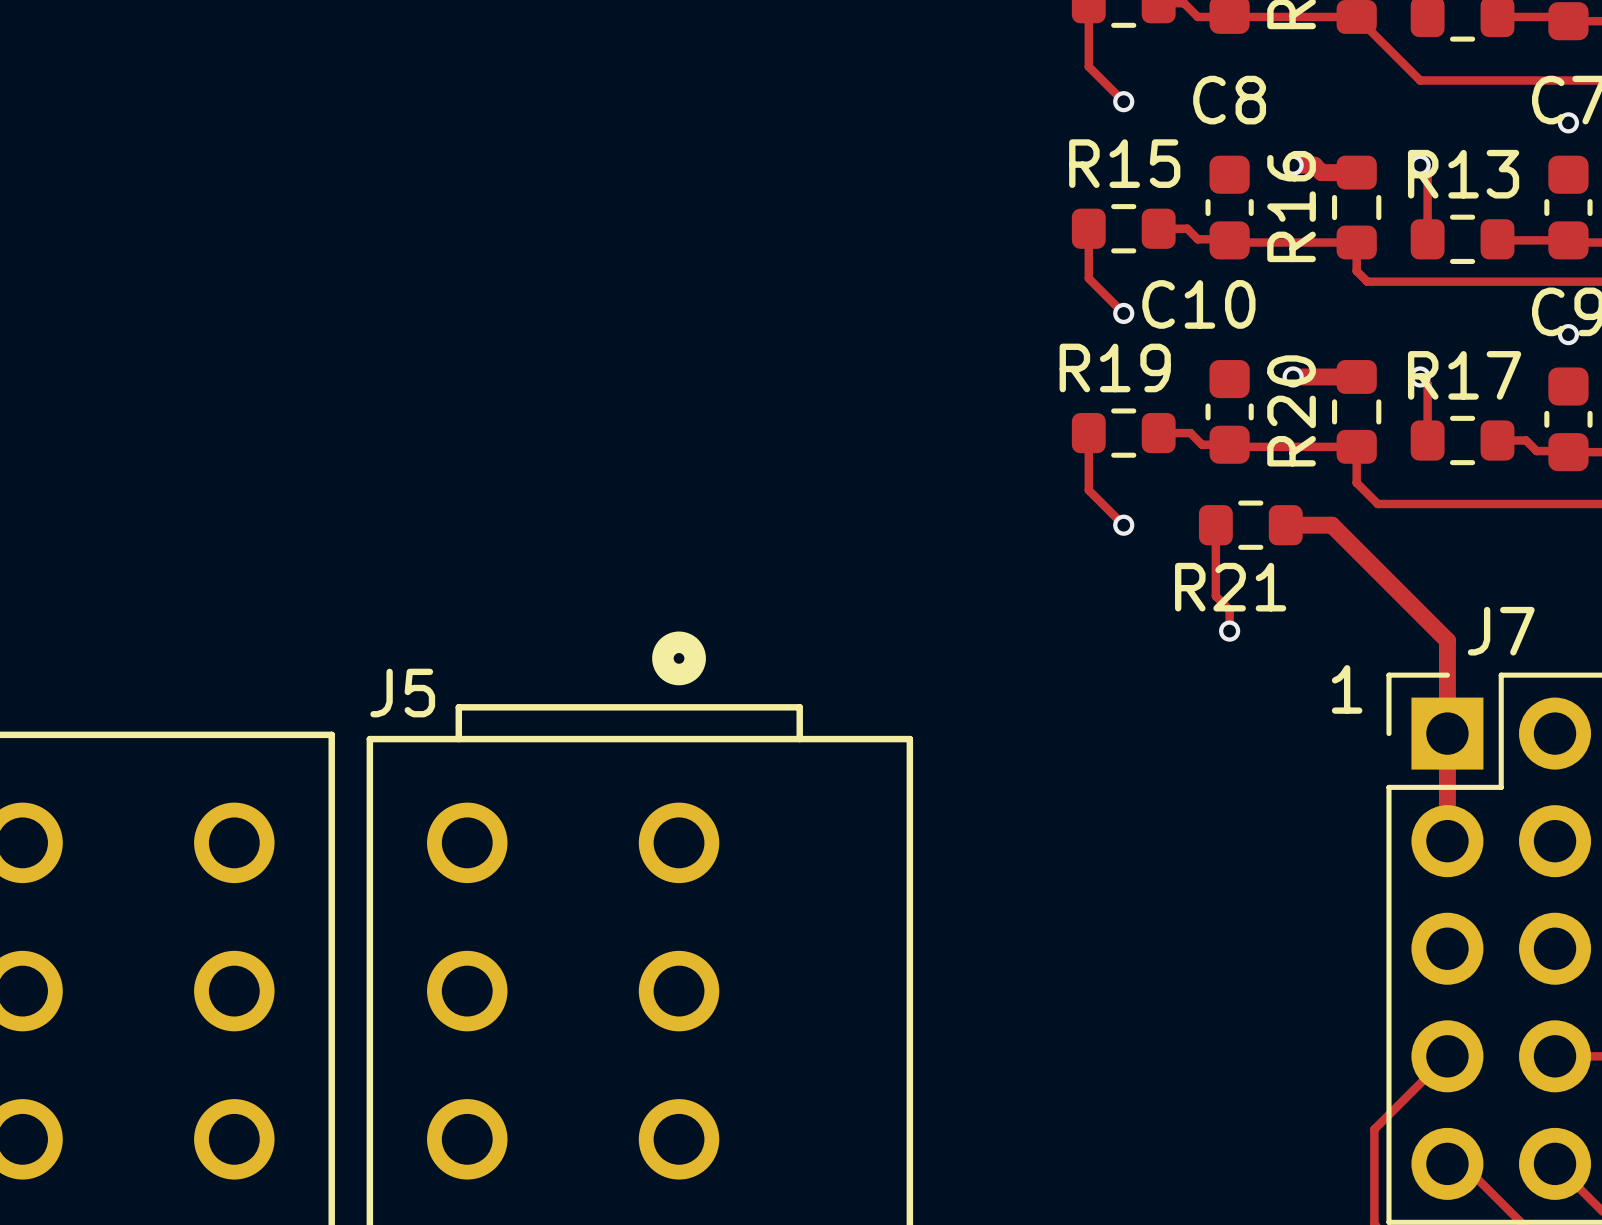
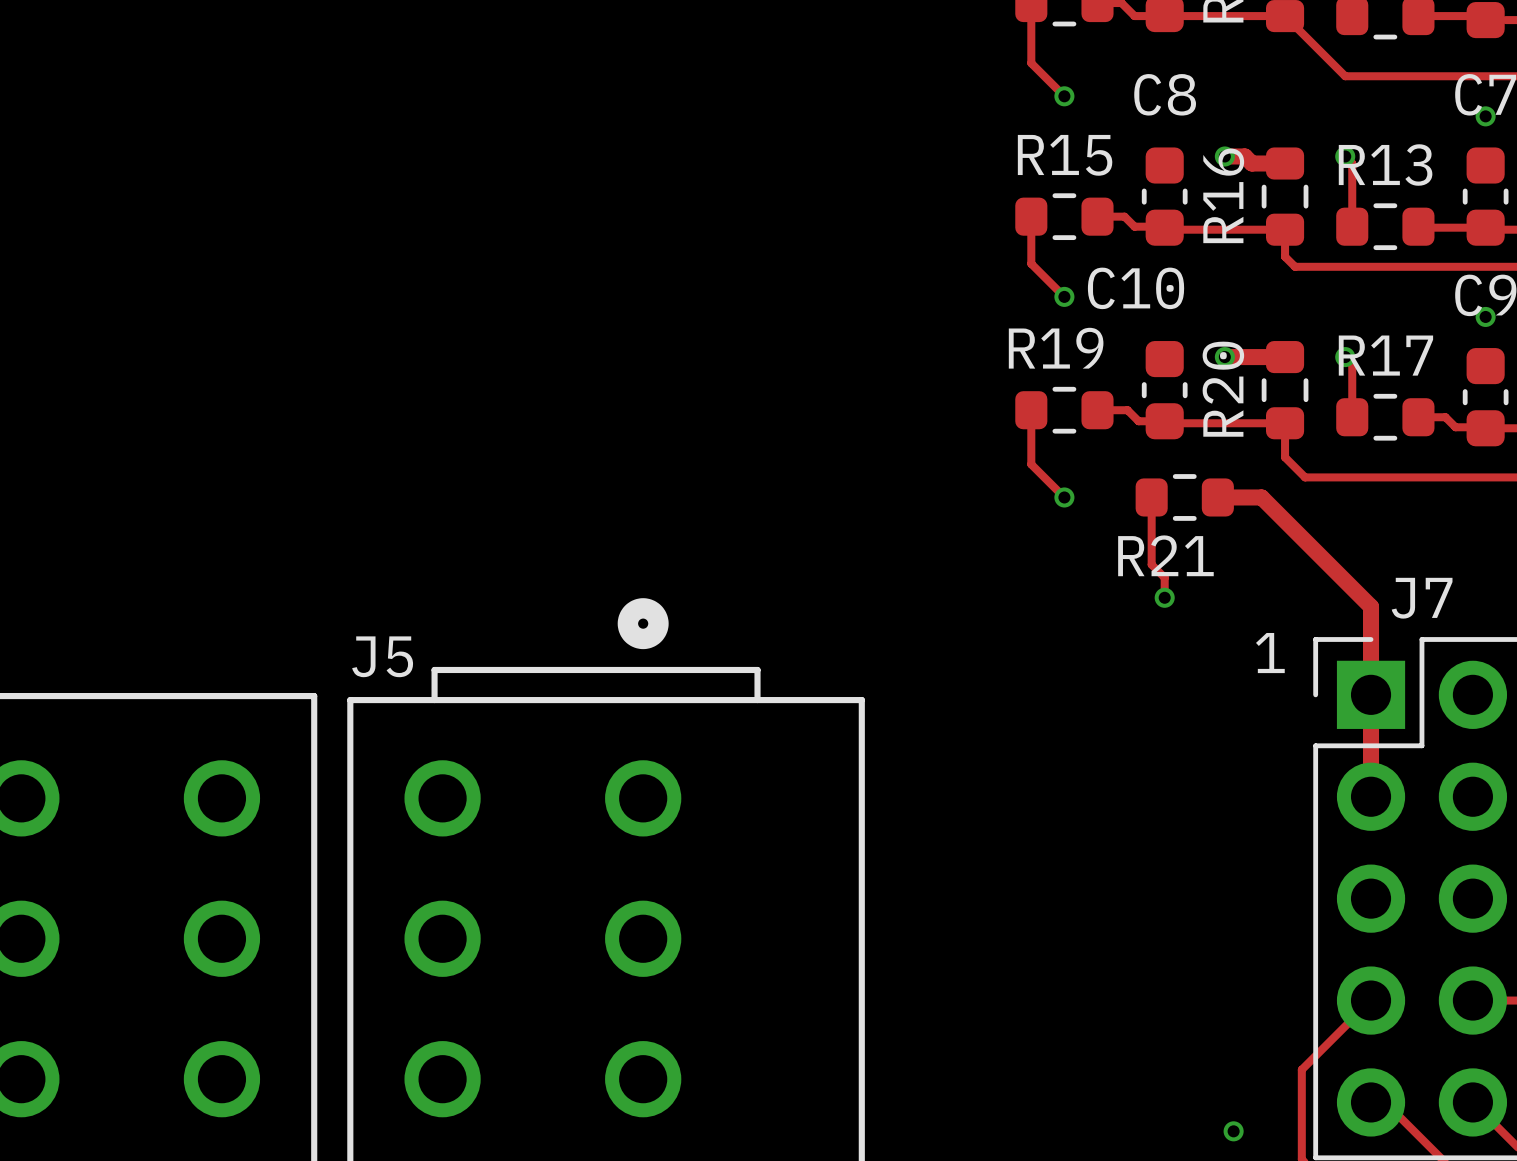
via: none -> (1233, 1131)

